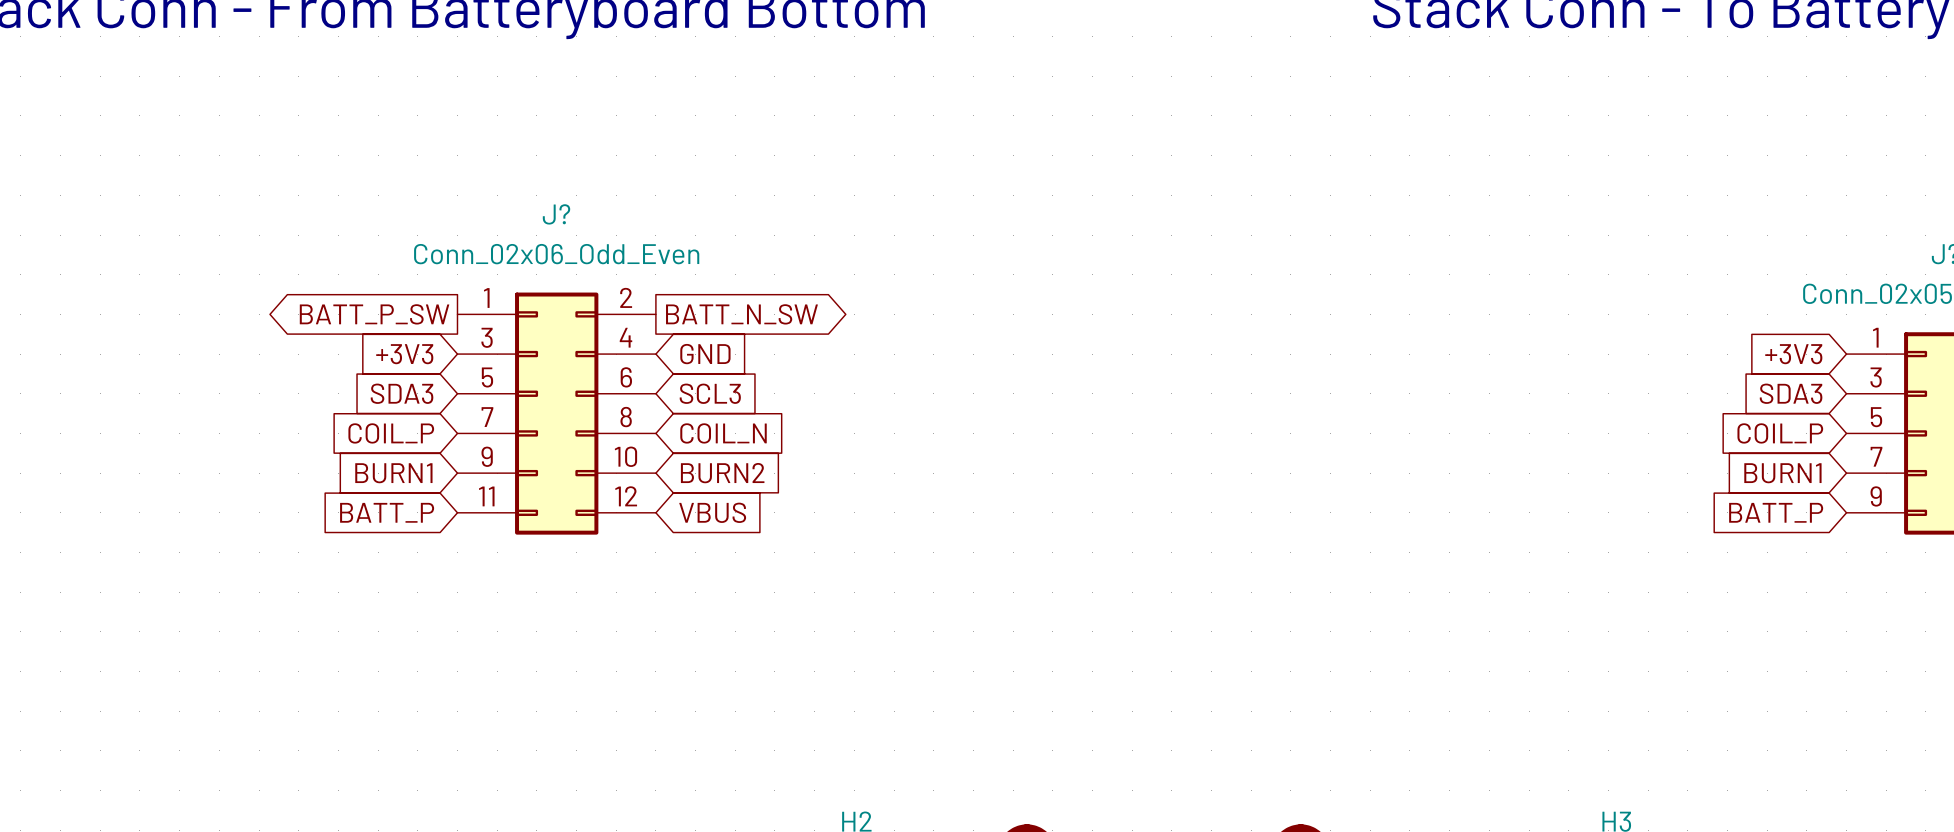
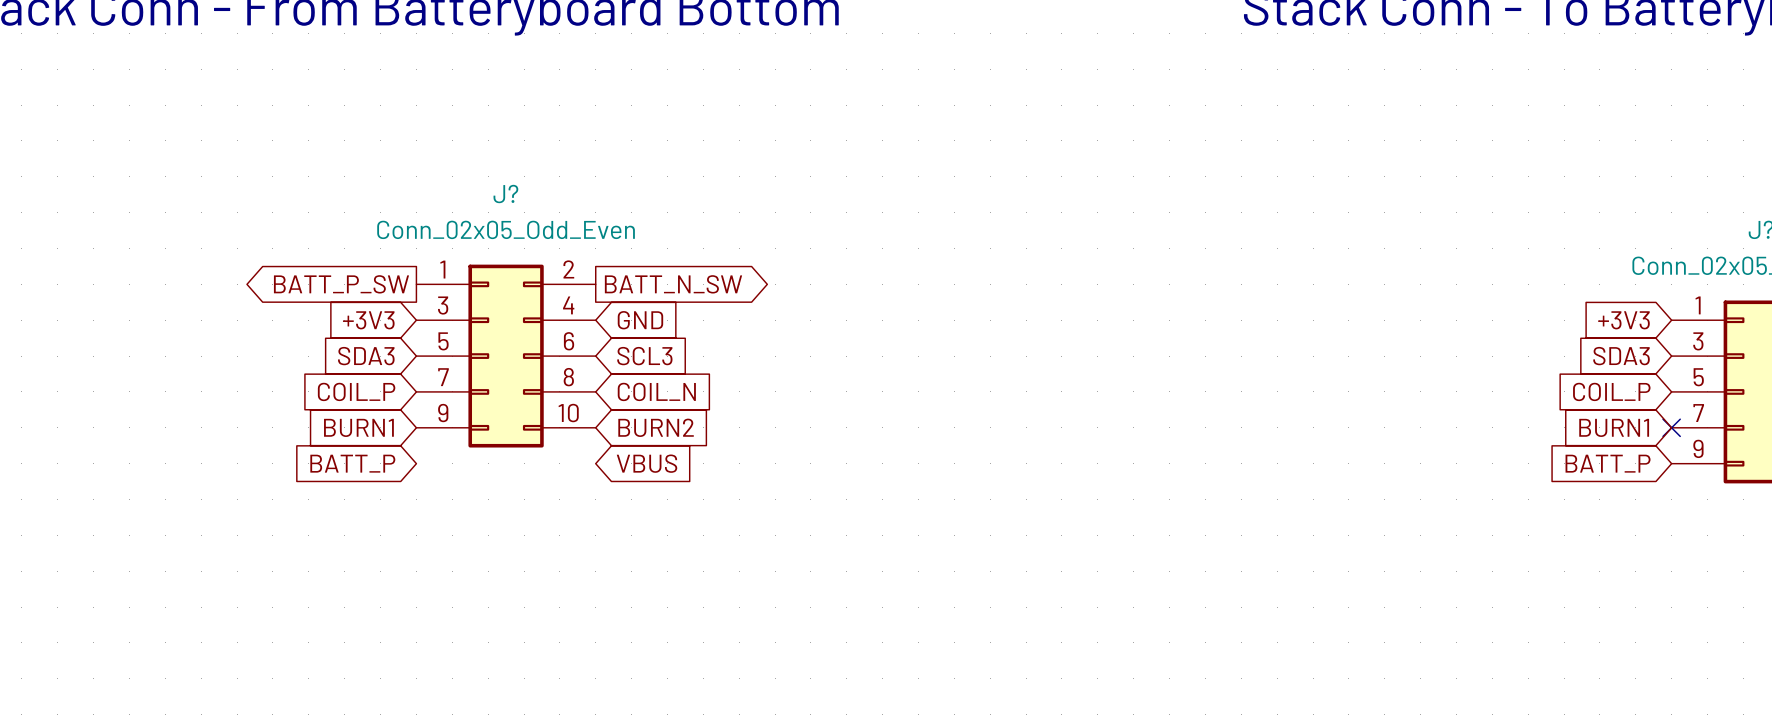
J?: none -> Conn_02x05_Odd_Even (506, 356)
J?: Conn_02x06_Odd_Even (556, 413) -> none
no-connect mark: none -> (1671, 427)

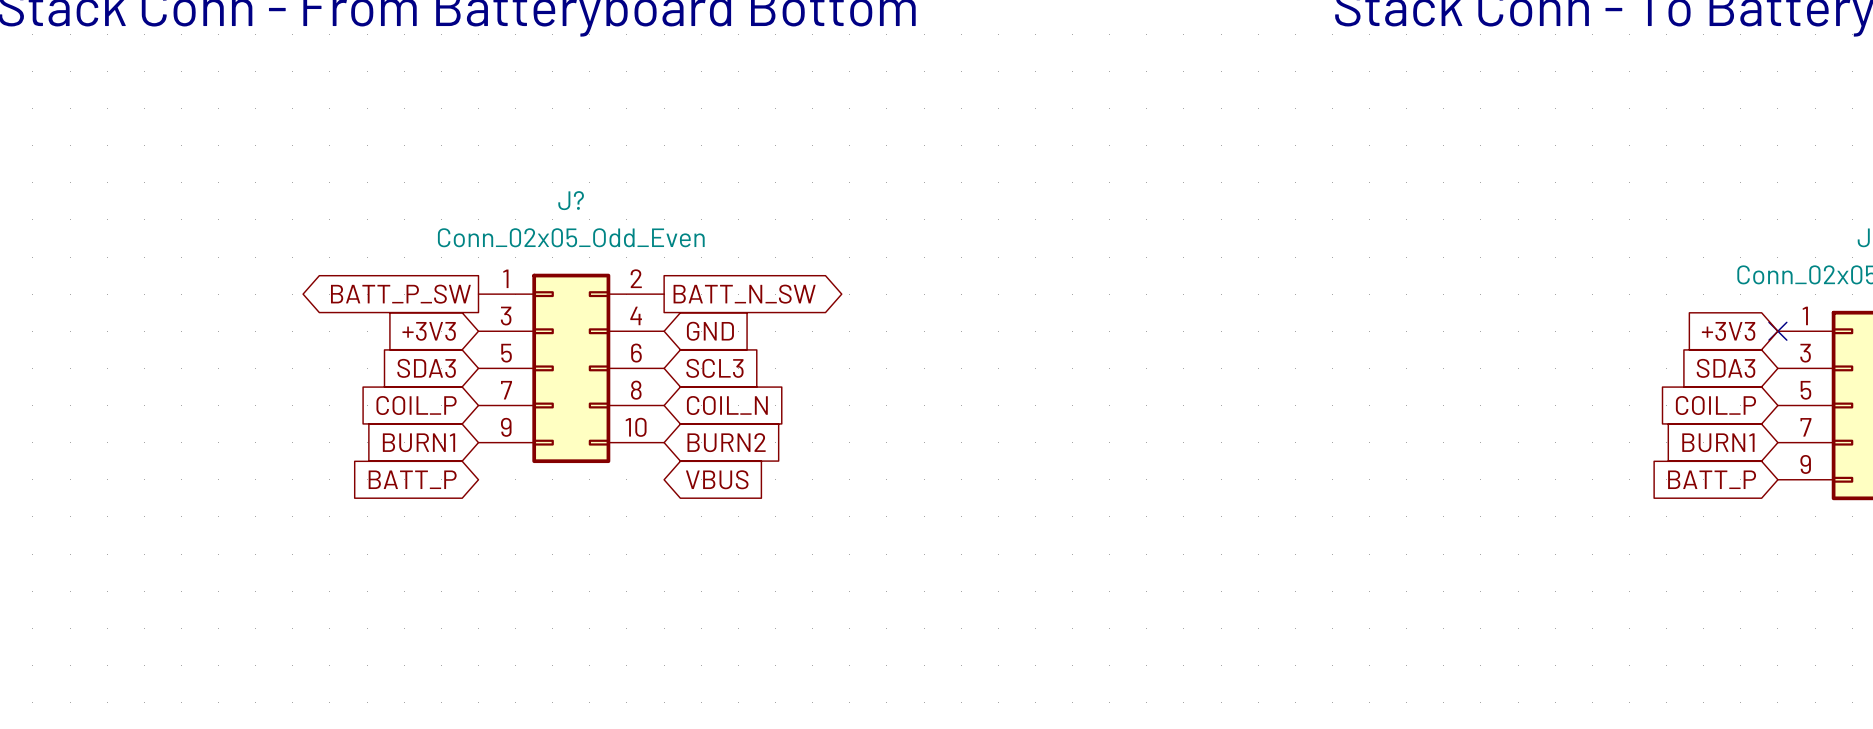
no-connect mark: none -> (1777, 331)
no-connect mark: (1671, 427) -> none

